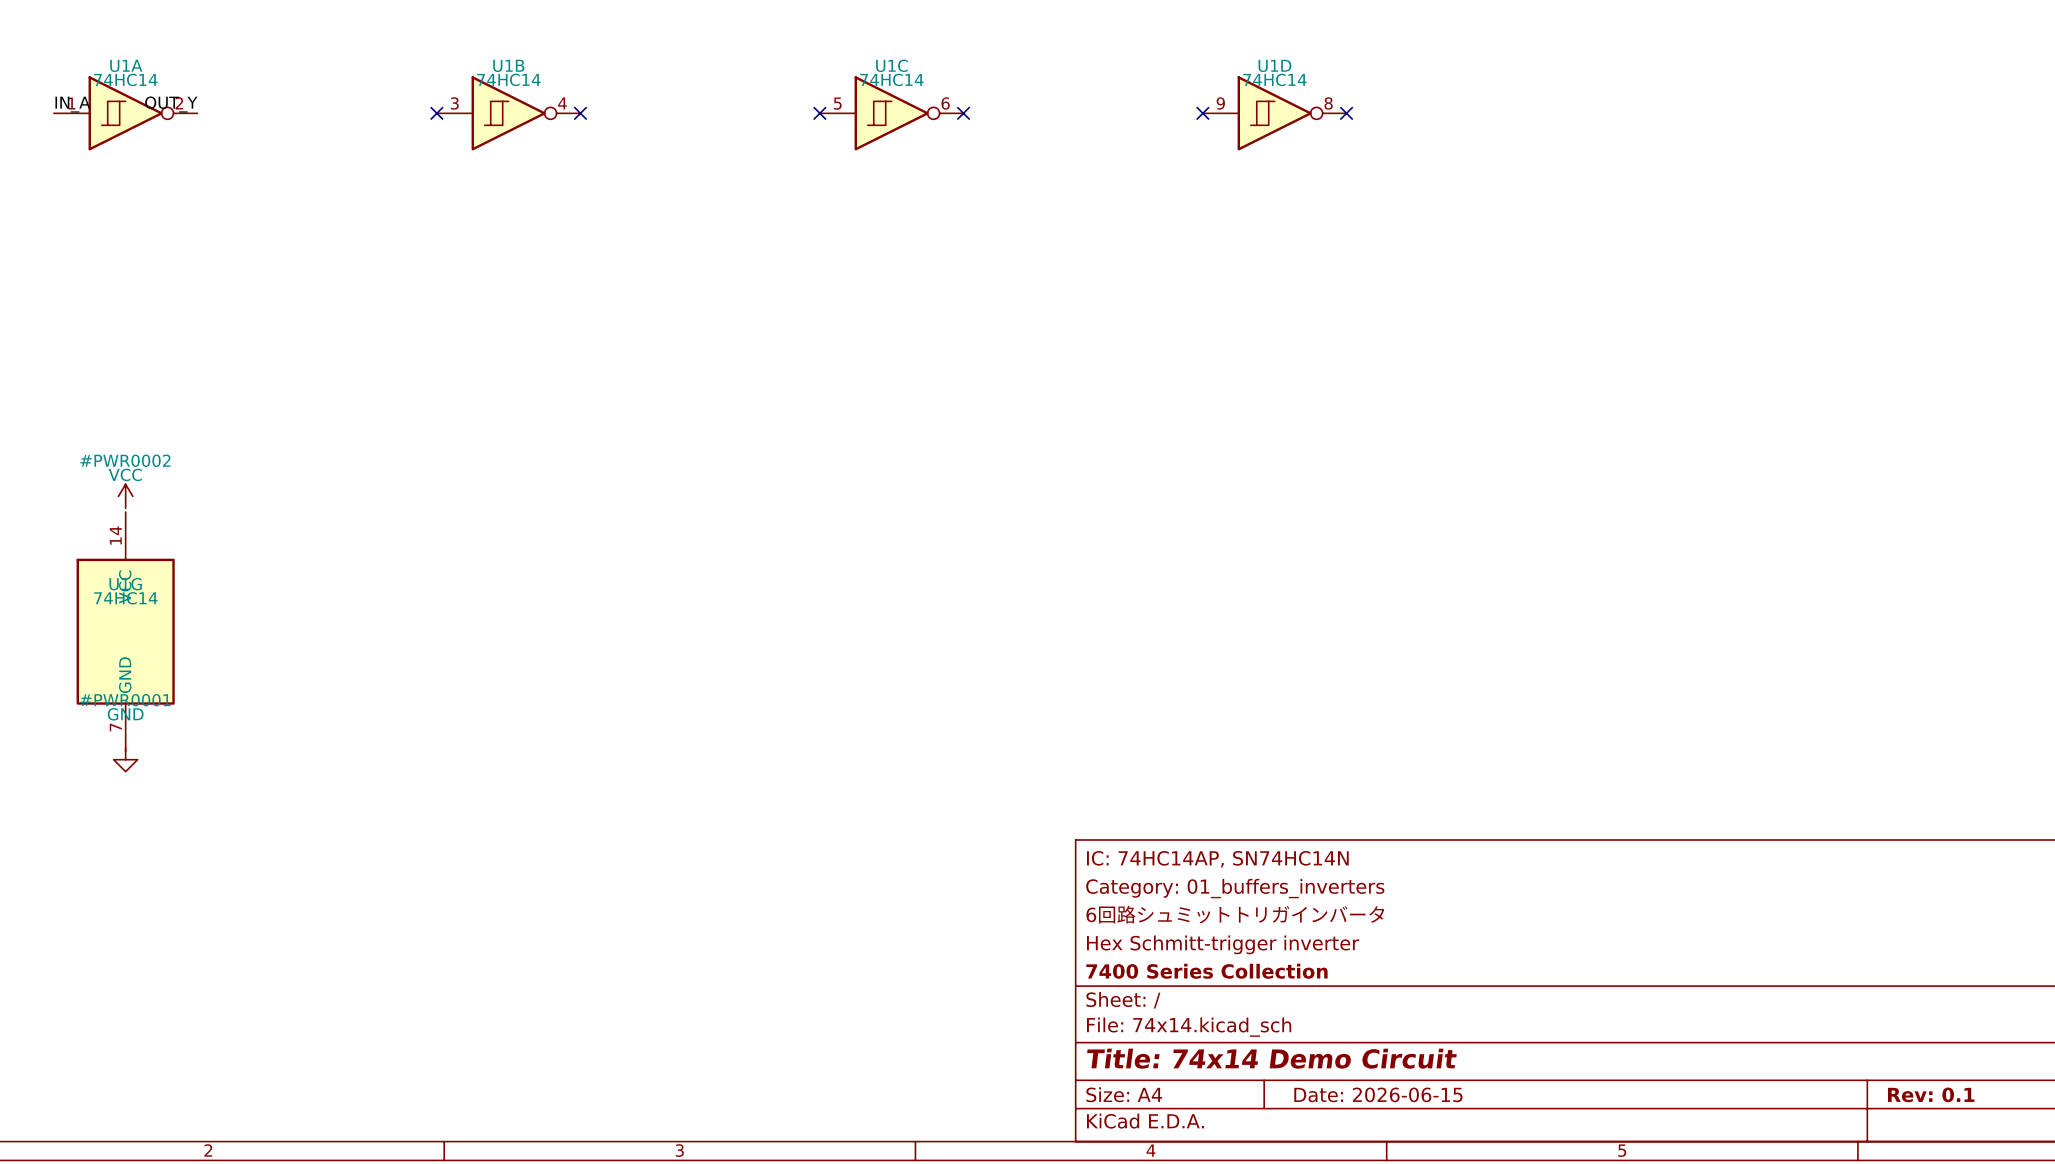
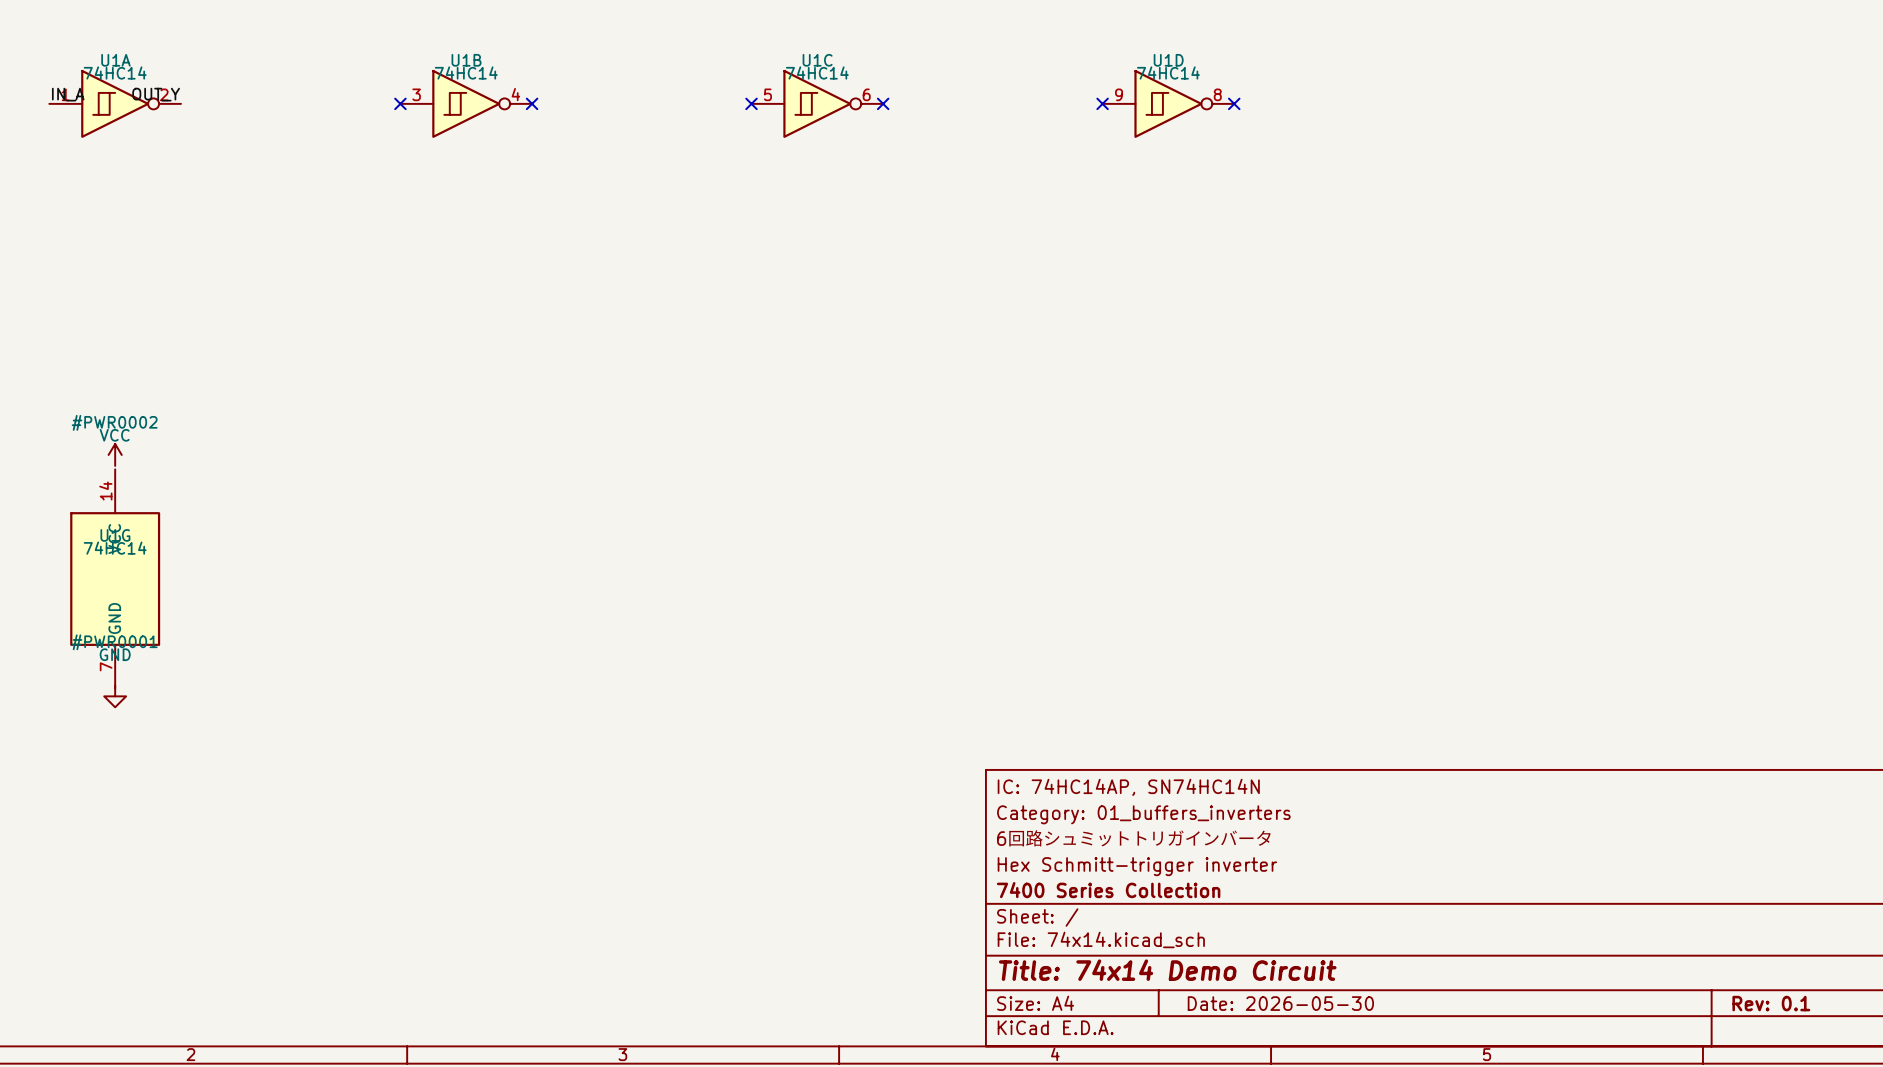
title block: Date: 2026-06-15 (1378, 1094) -> Date: 2026-05-30 (1280, 1003)

